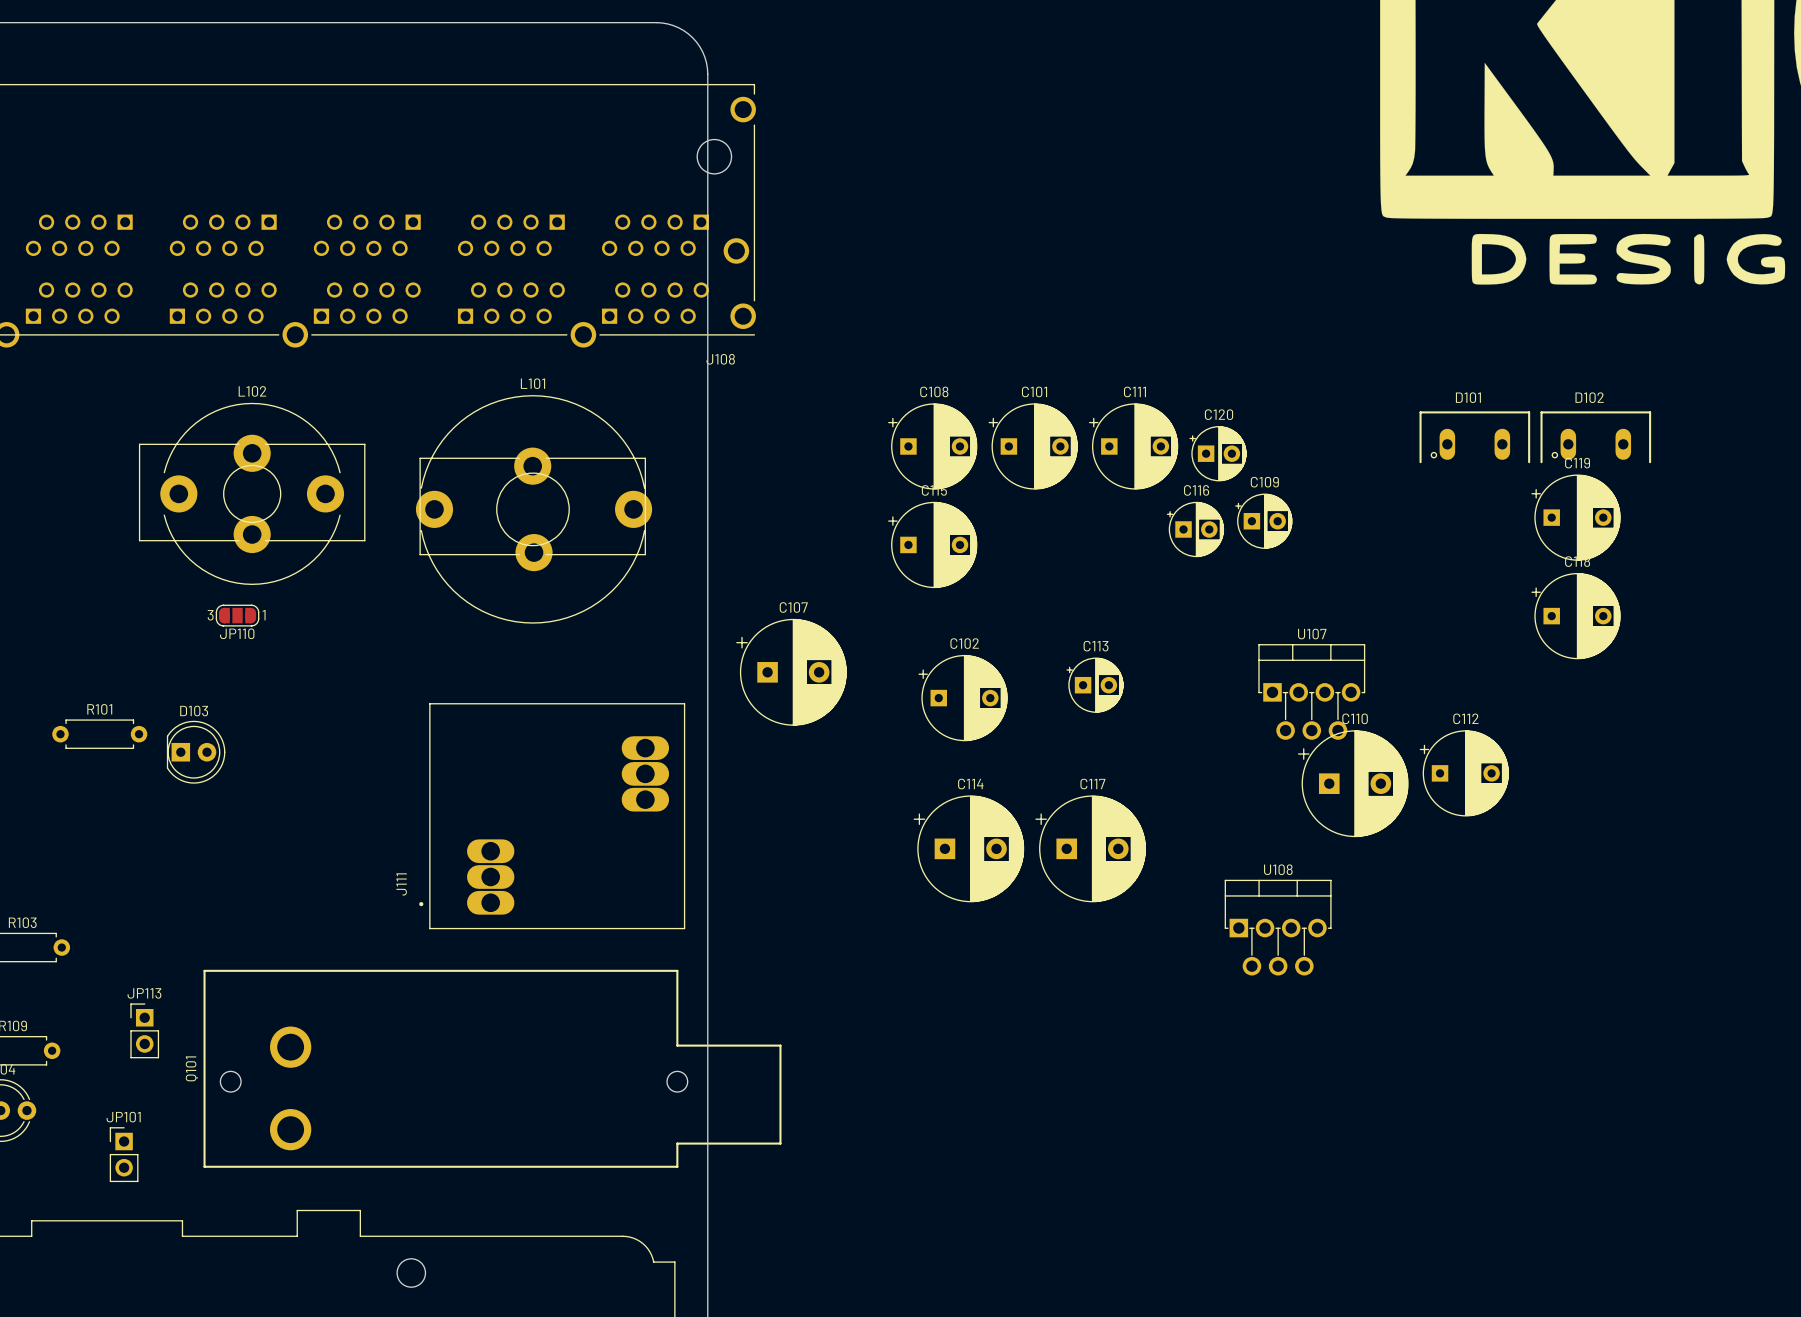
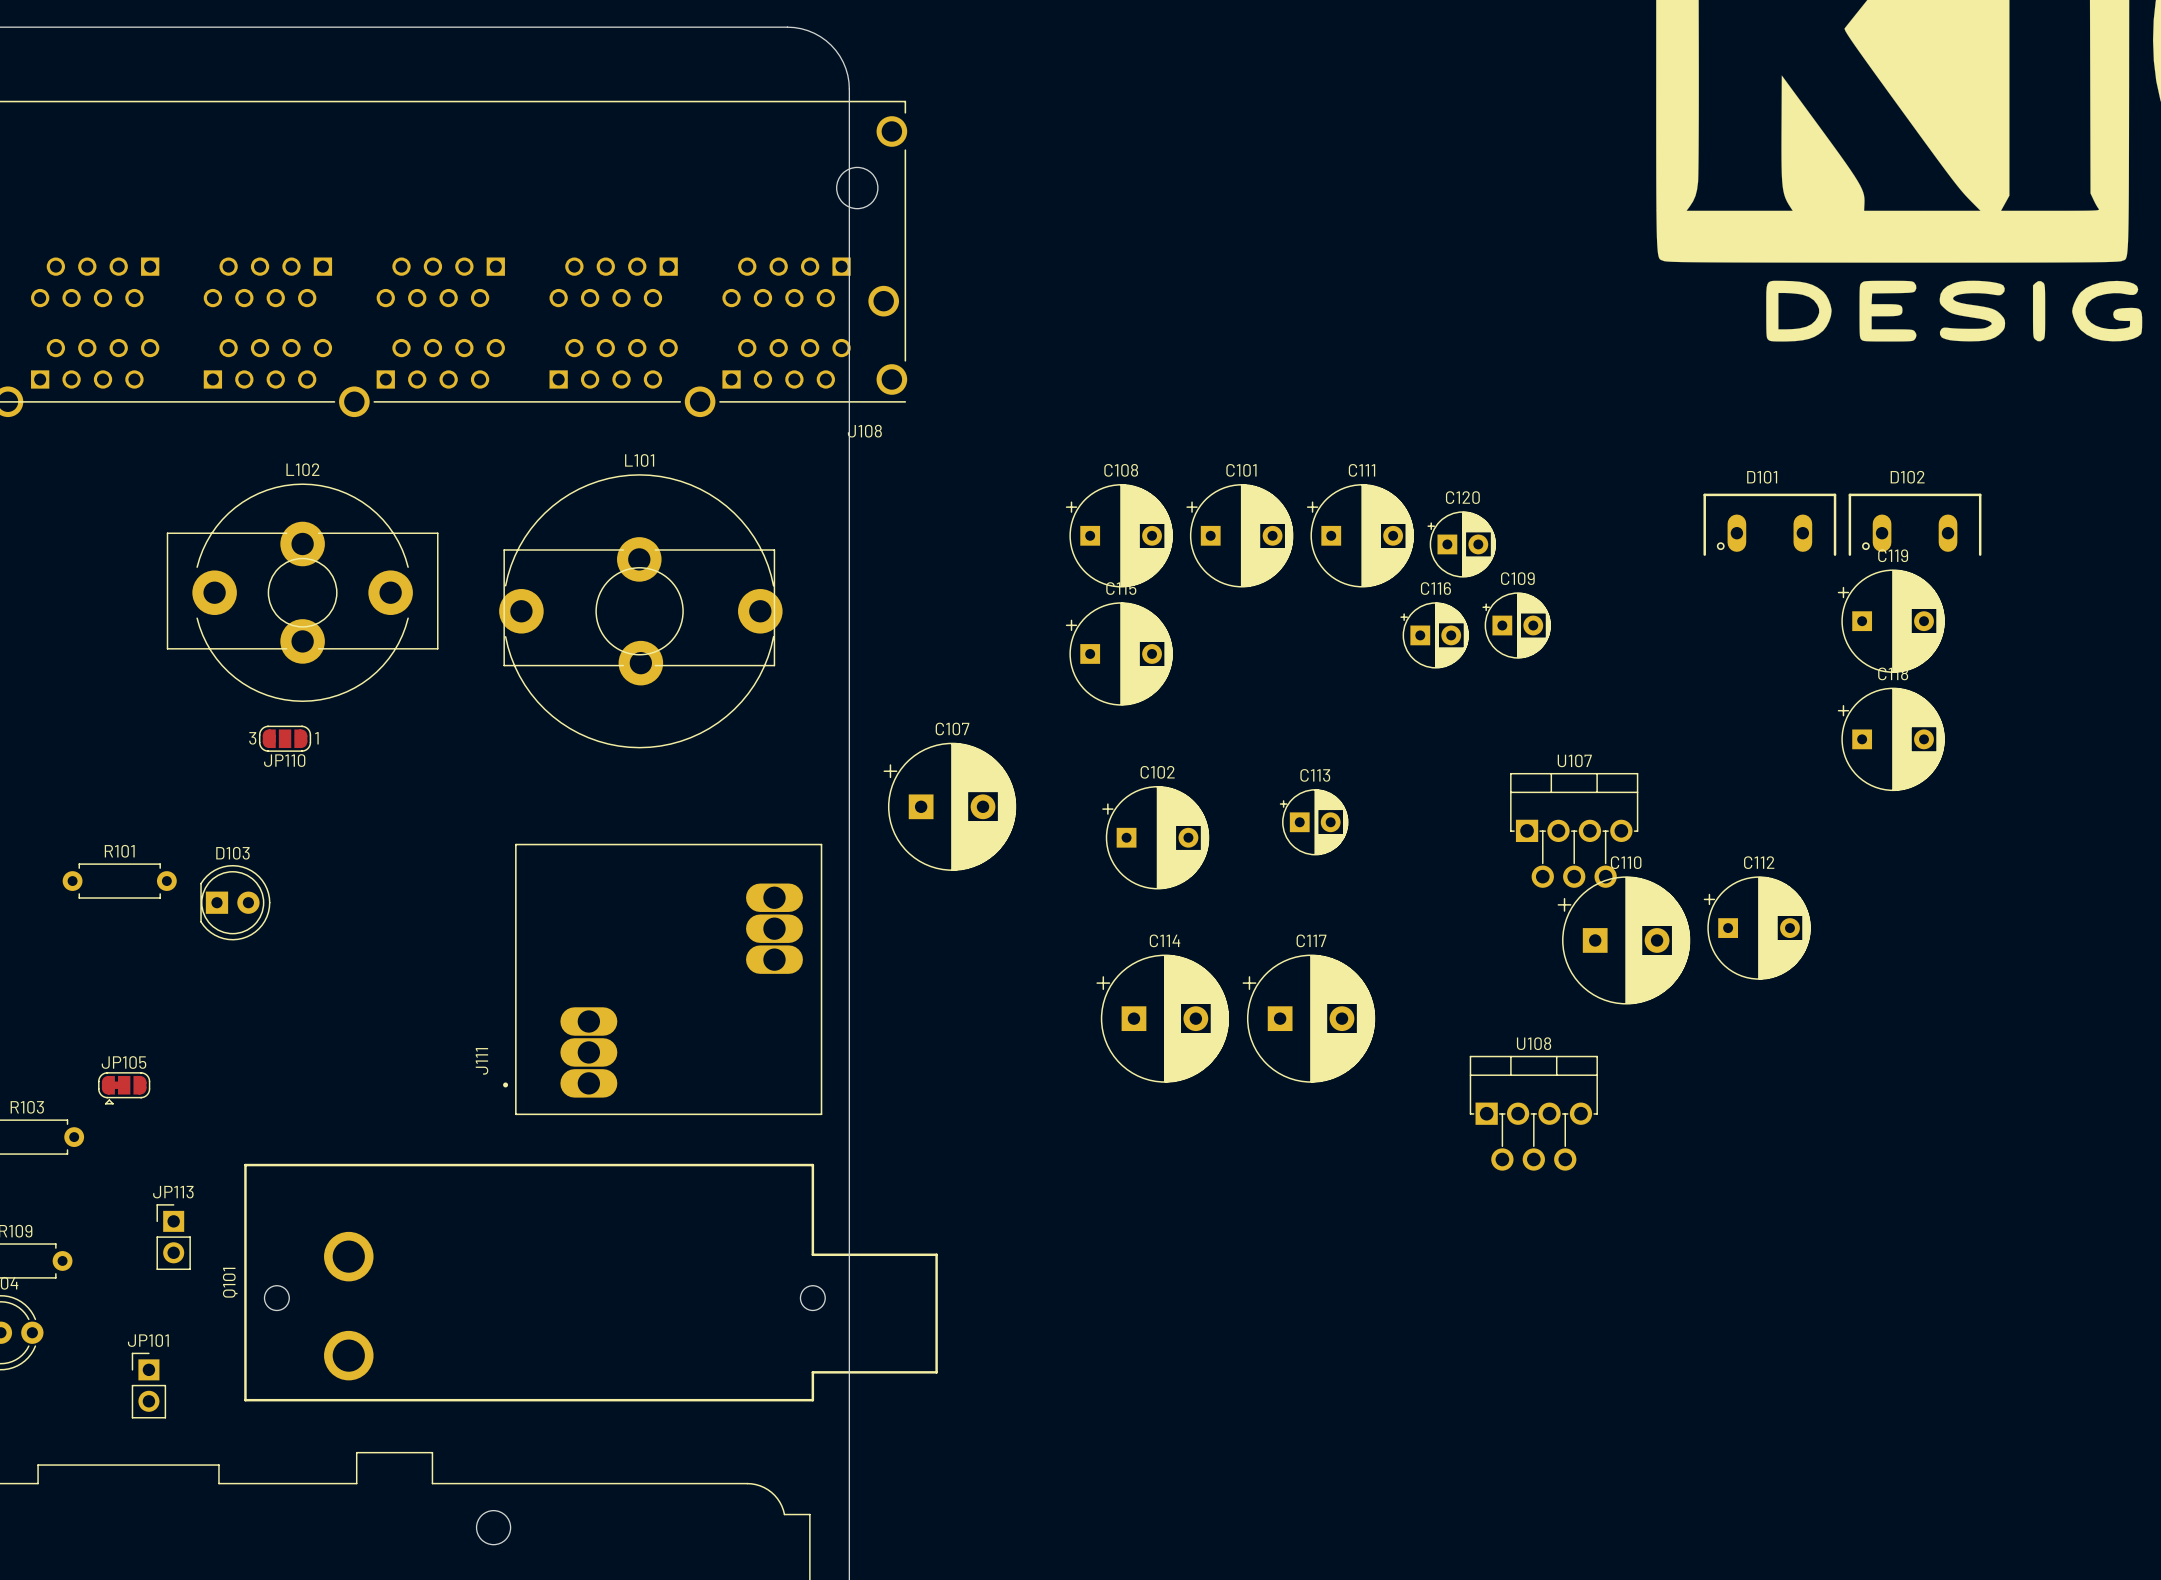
JP105: none -> (124, 1088)

